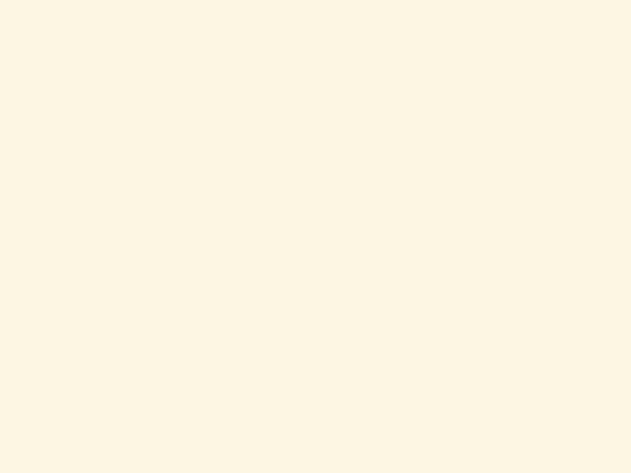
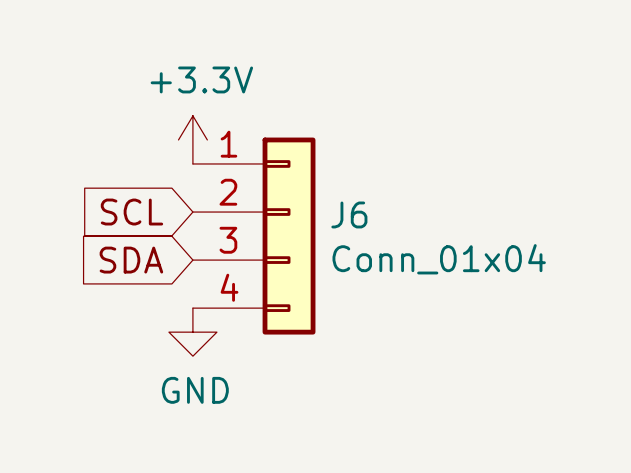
power symbol: none -> +3.3V (192, 139)
global label: none -> SCL (131, 212)
J6: none -> Conn_01x04 (254, 236)
global label: none -> SDA (131, 260)
power symbol: none -> GND (192, 332)

